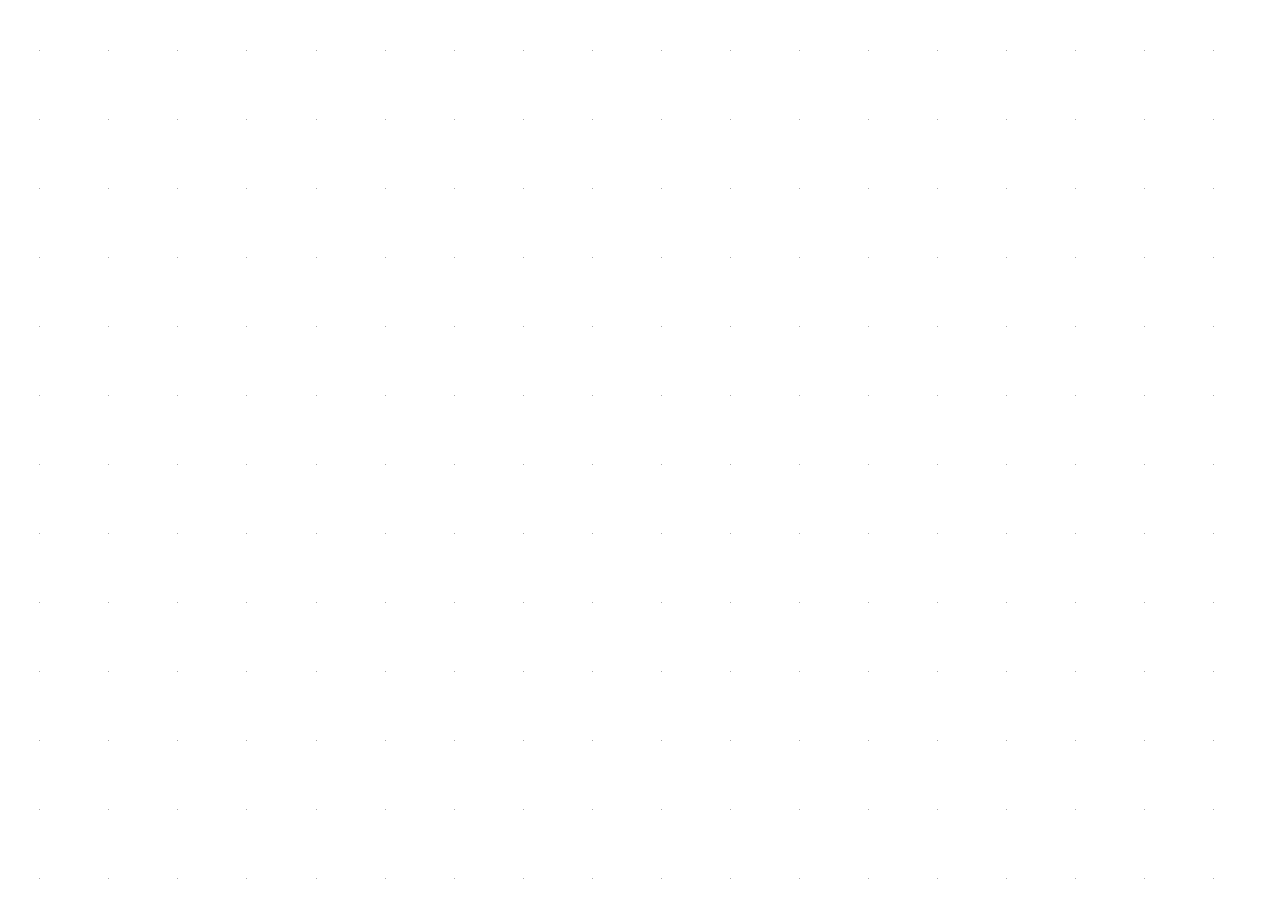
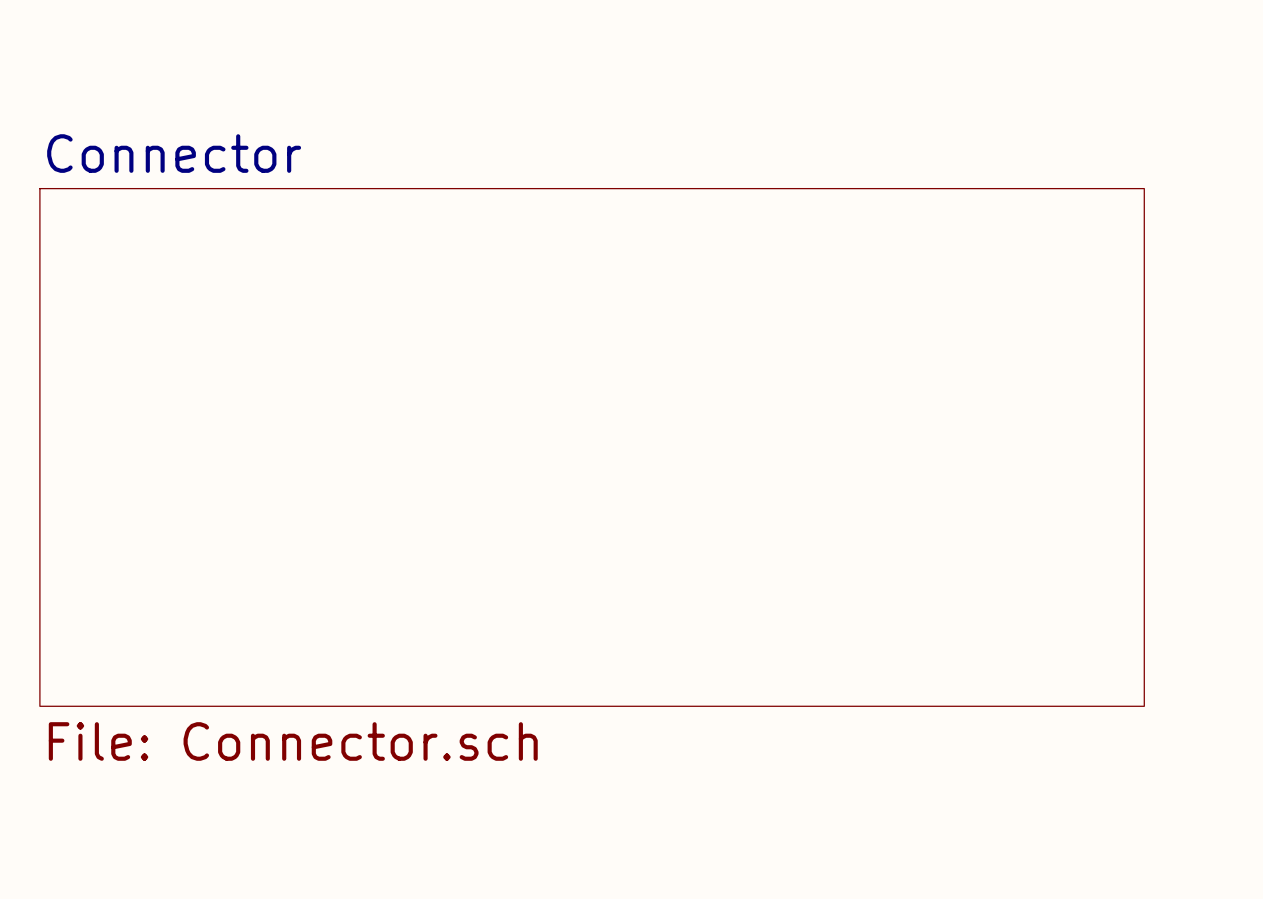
sheet Connector: none -> File: Connector.sch (592, 447)

